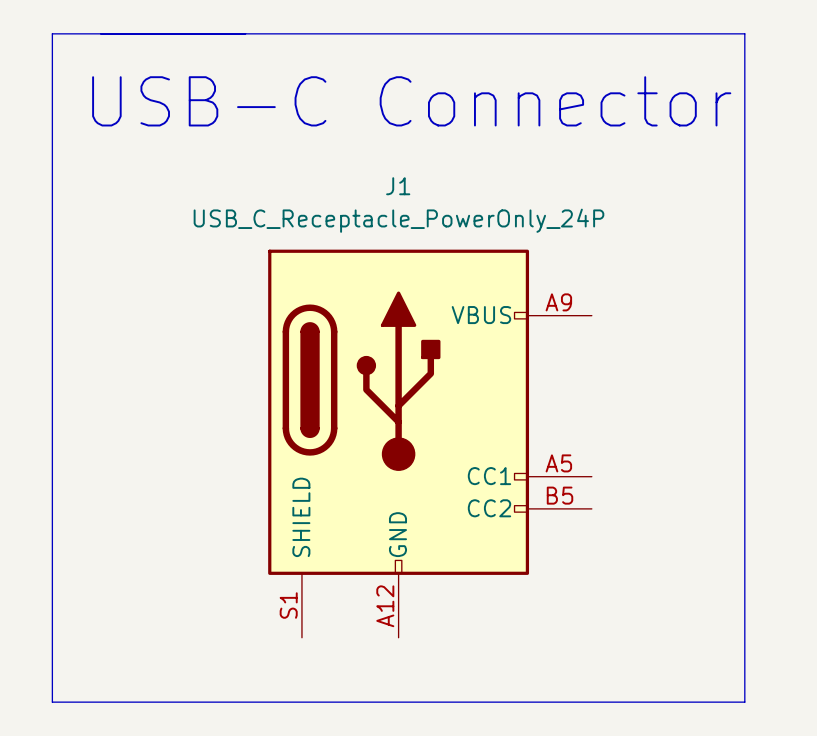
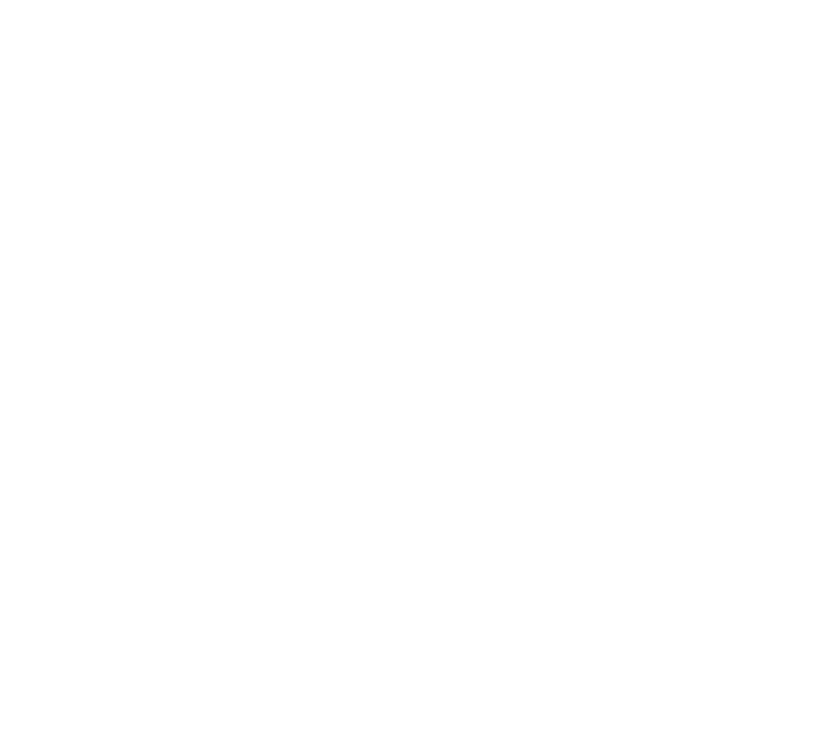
line: (52, 33) (744, 33) (744, 702) (52, 702) (52, 33) -> none
text: USB-C Connector (411, 101) -> none
J1: USB_C_Receptacle_PowerOnly_24P (429, 443) -> none

